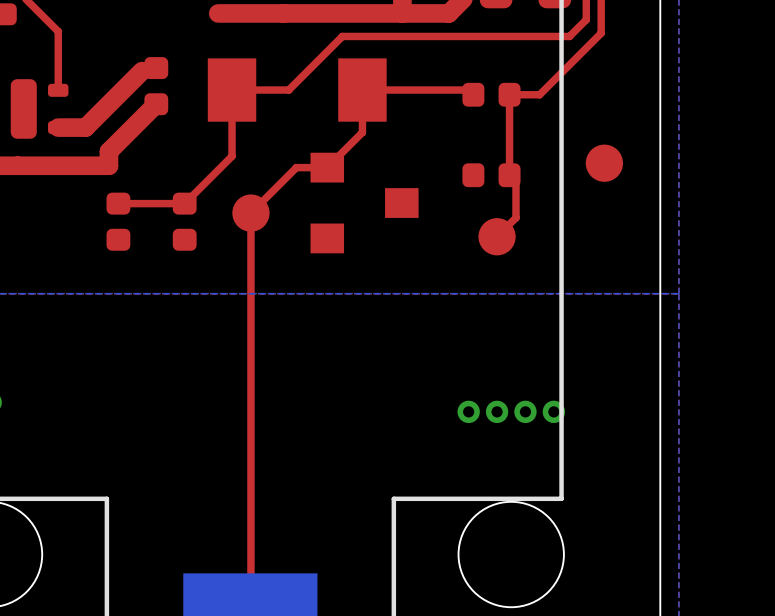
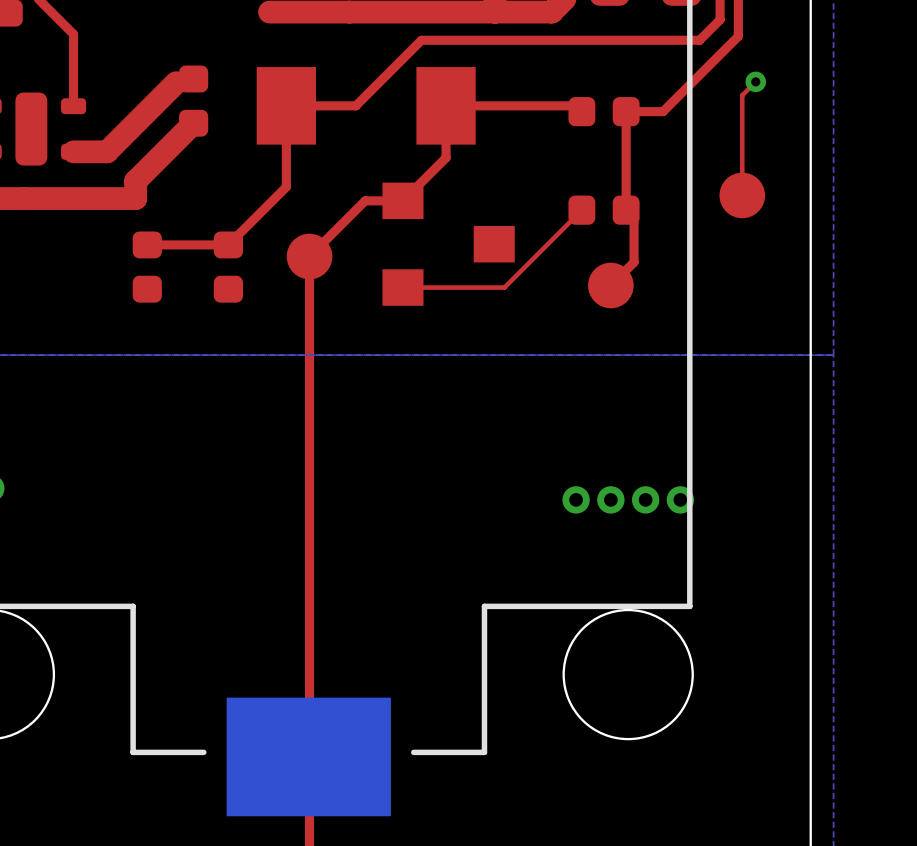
top track: none -> (755, 81) (742, 95) (742, 195)
via: none -> (755, 81)
top track: none -> (581, 210) (504, 287) (402, 287)

